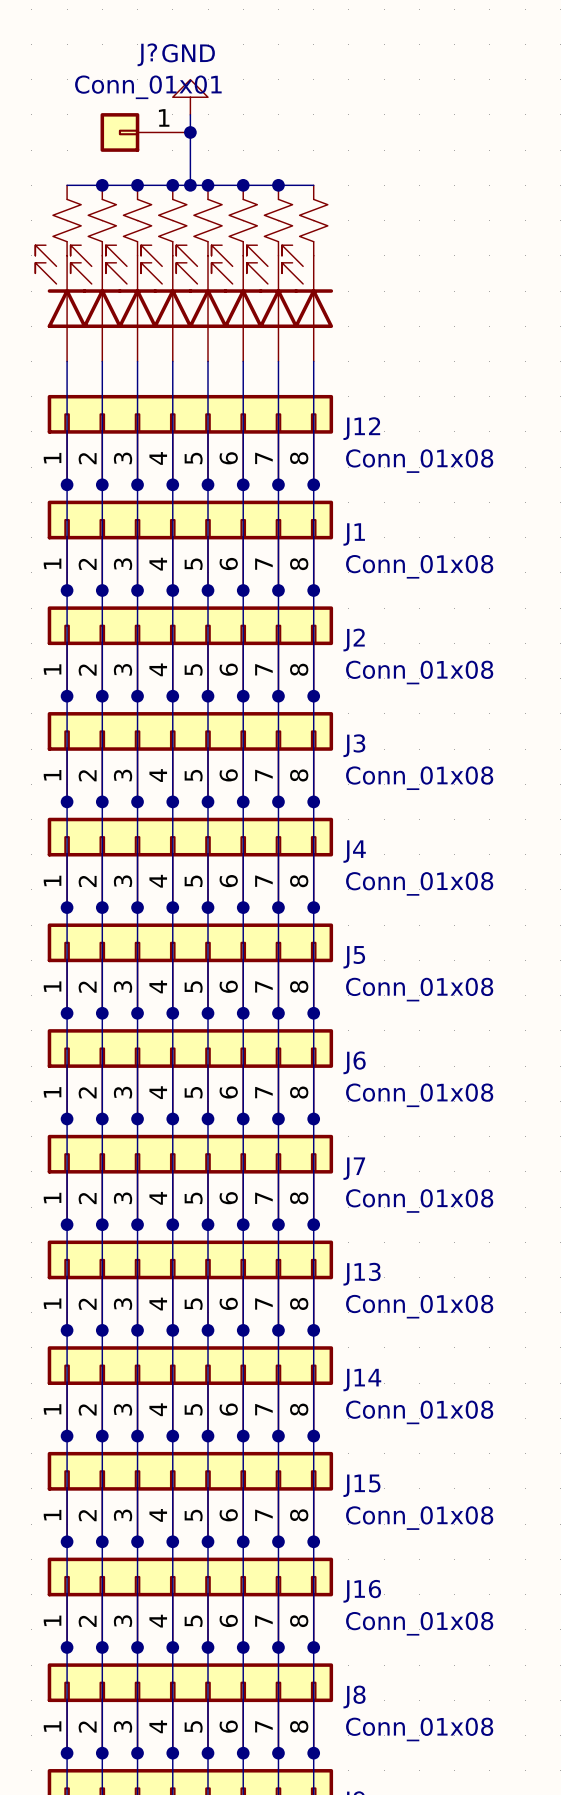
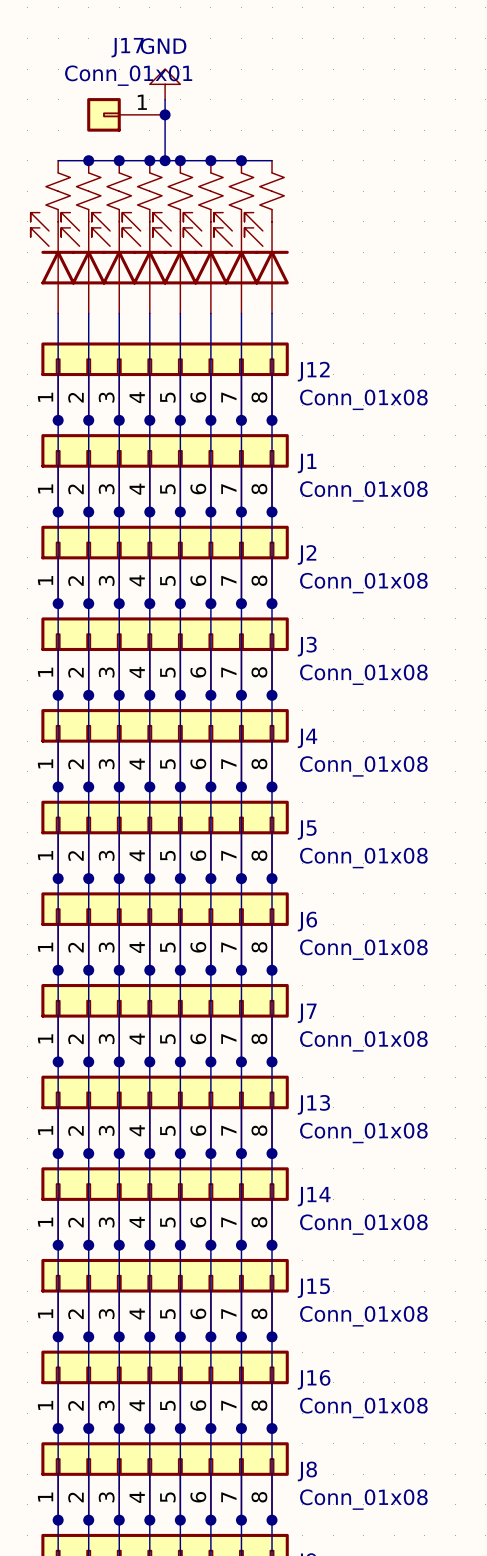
J? name: J? (147, 54) -> J17 (127, 47)

